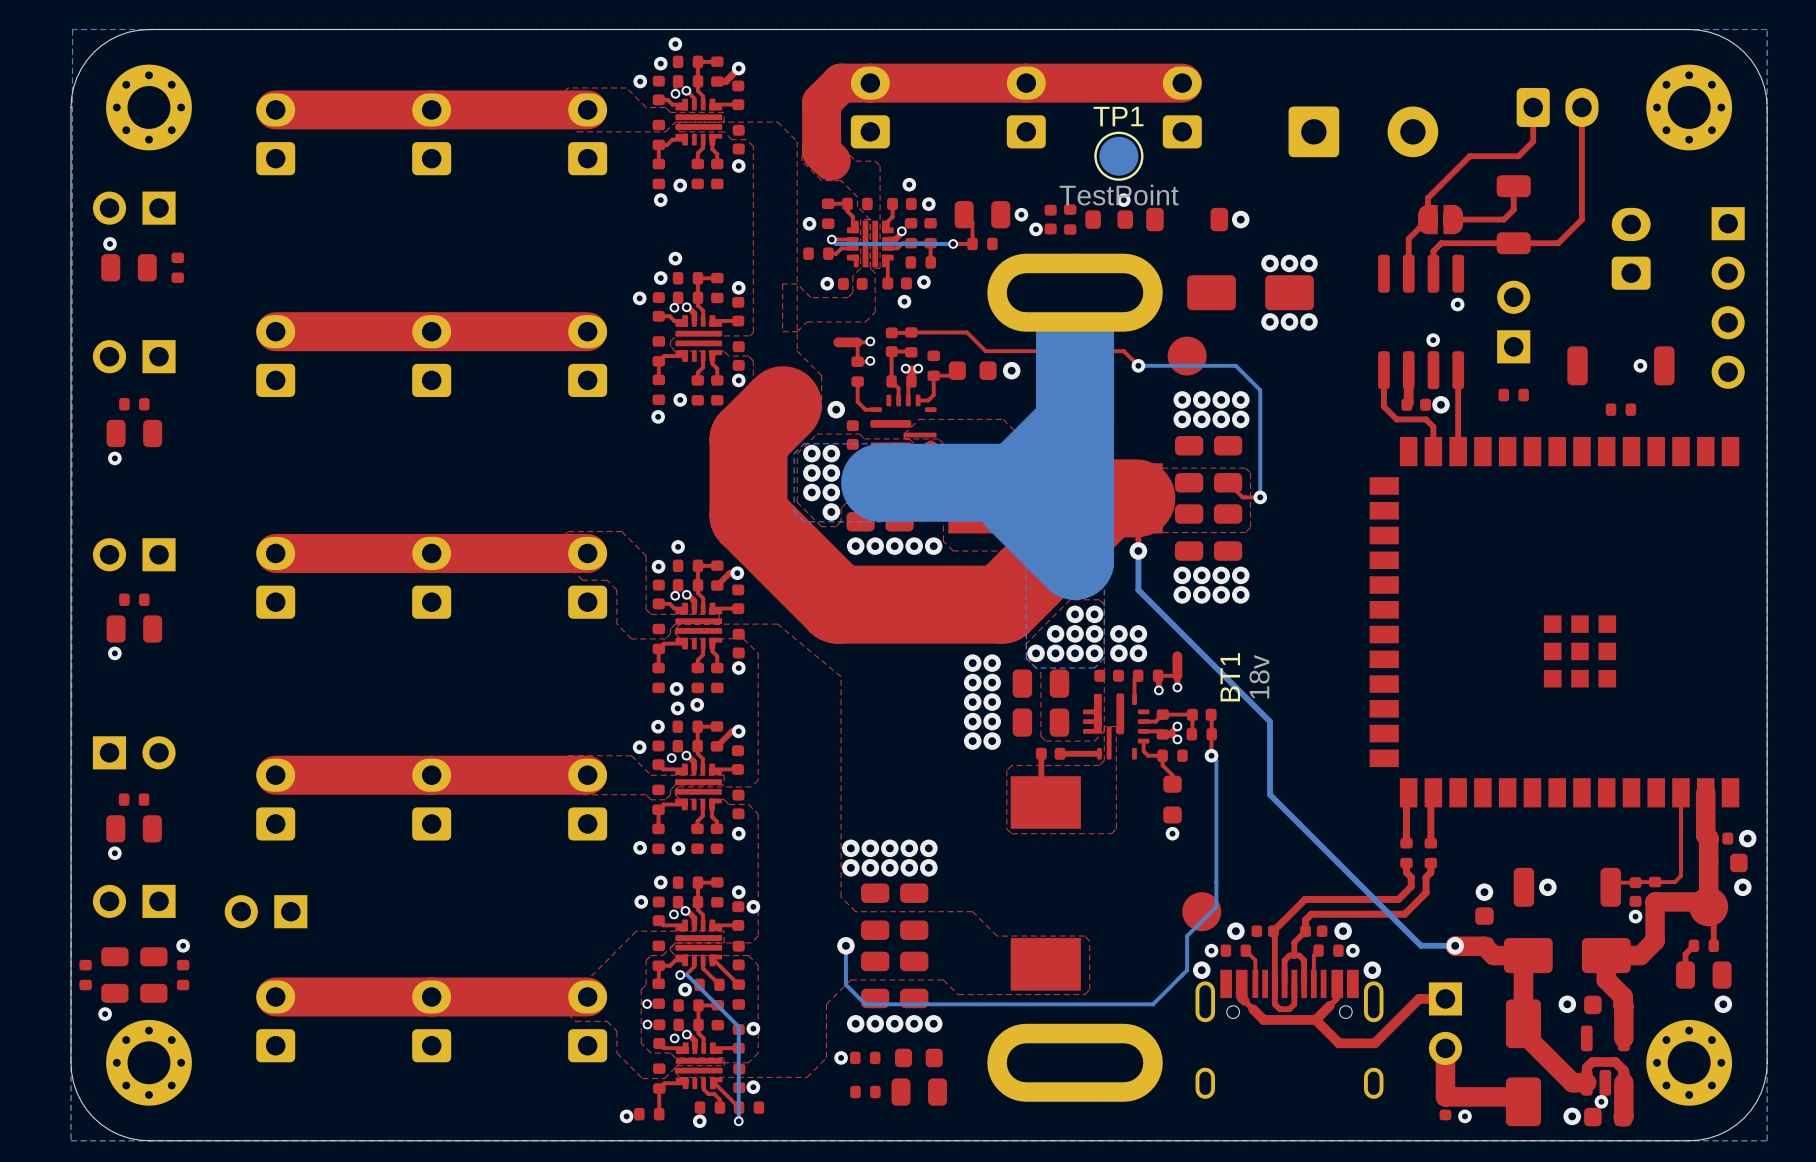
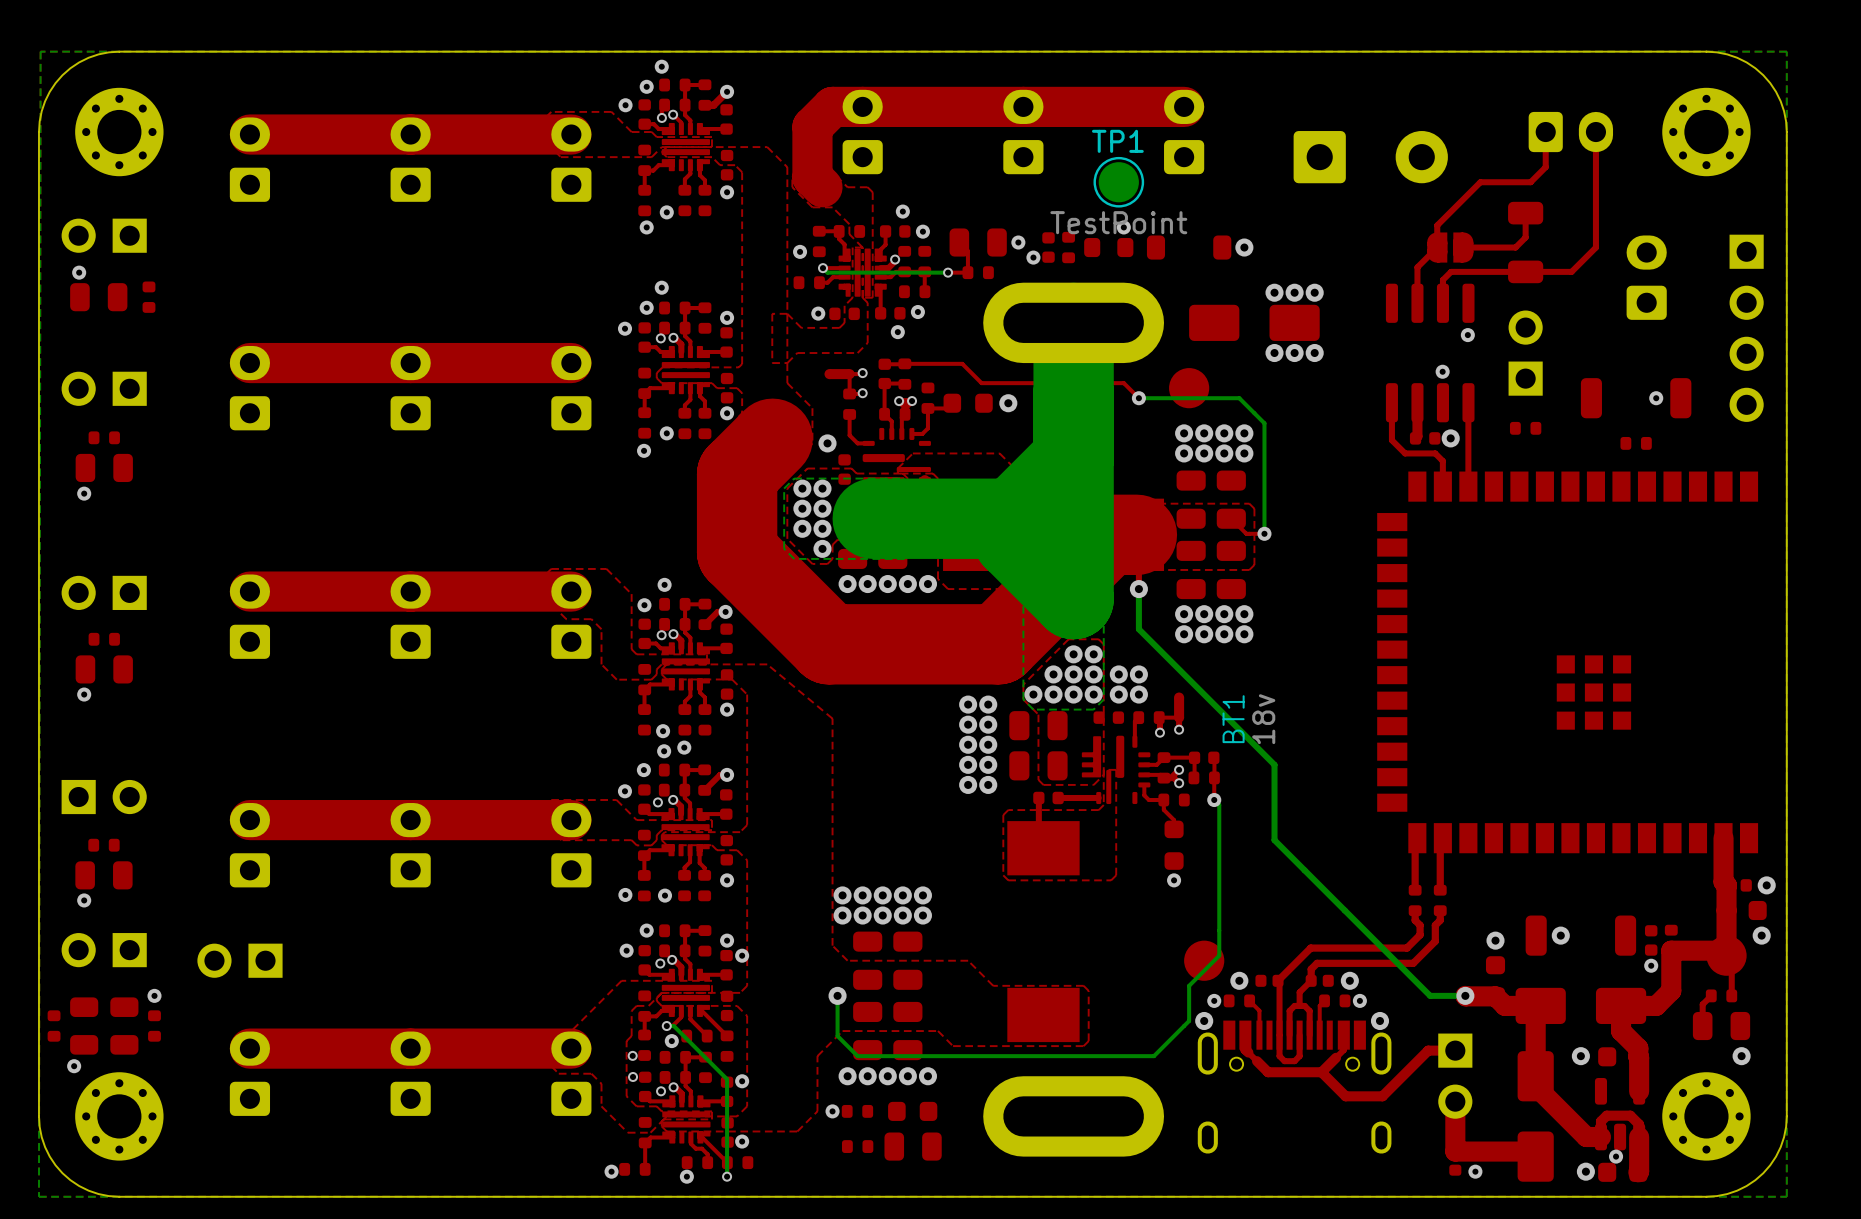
top track: (1680, 792) (1680, 876) (1674, 882) (1615, 882) (1610, 887) -> none

